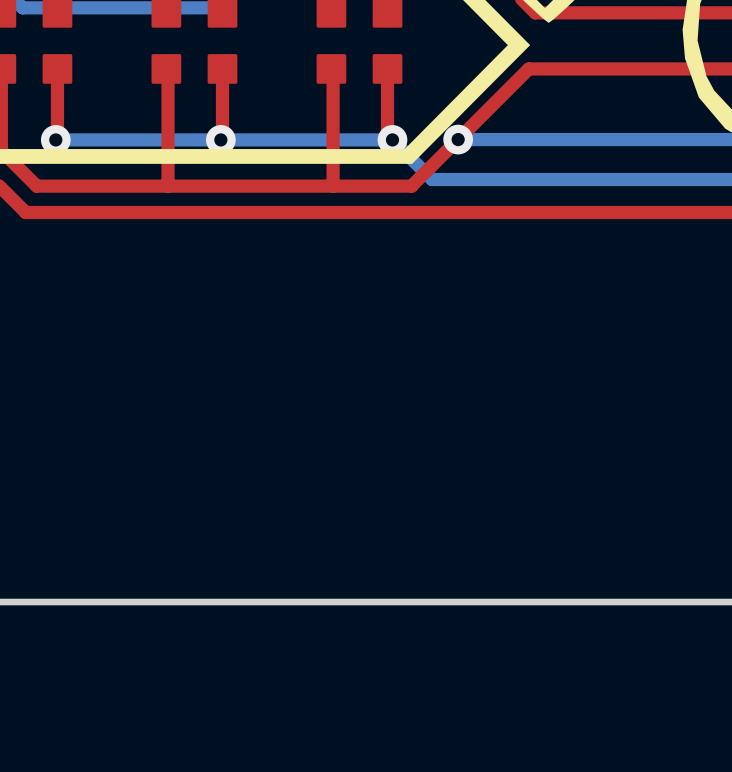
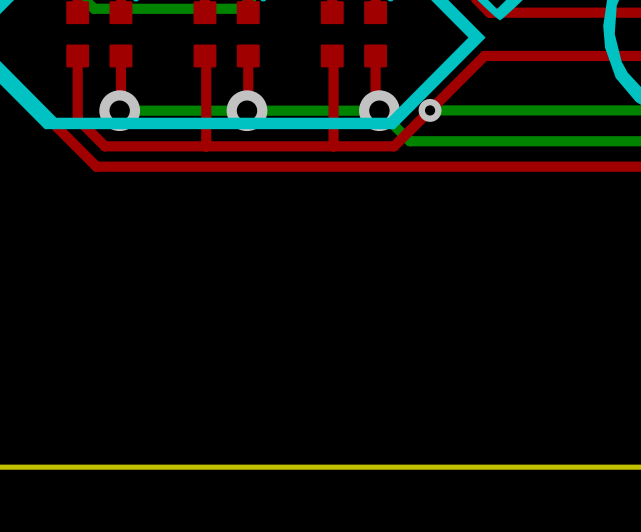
via size: [40, 125, 71, 155] -> [99, 90, 141, 132]
via size: [205, 125, 236, 155] -> [226, 90, 268, 132]
via size: [377, 125, 408, 155] -> [359, 90, 400, 132]

